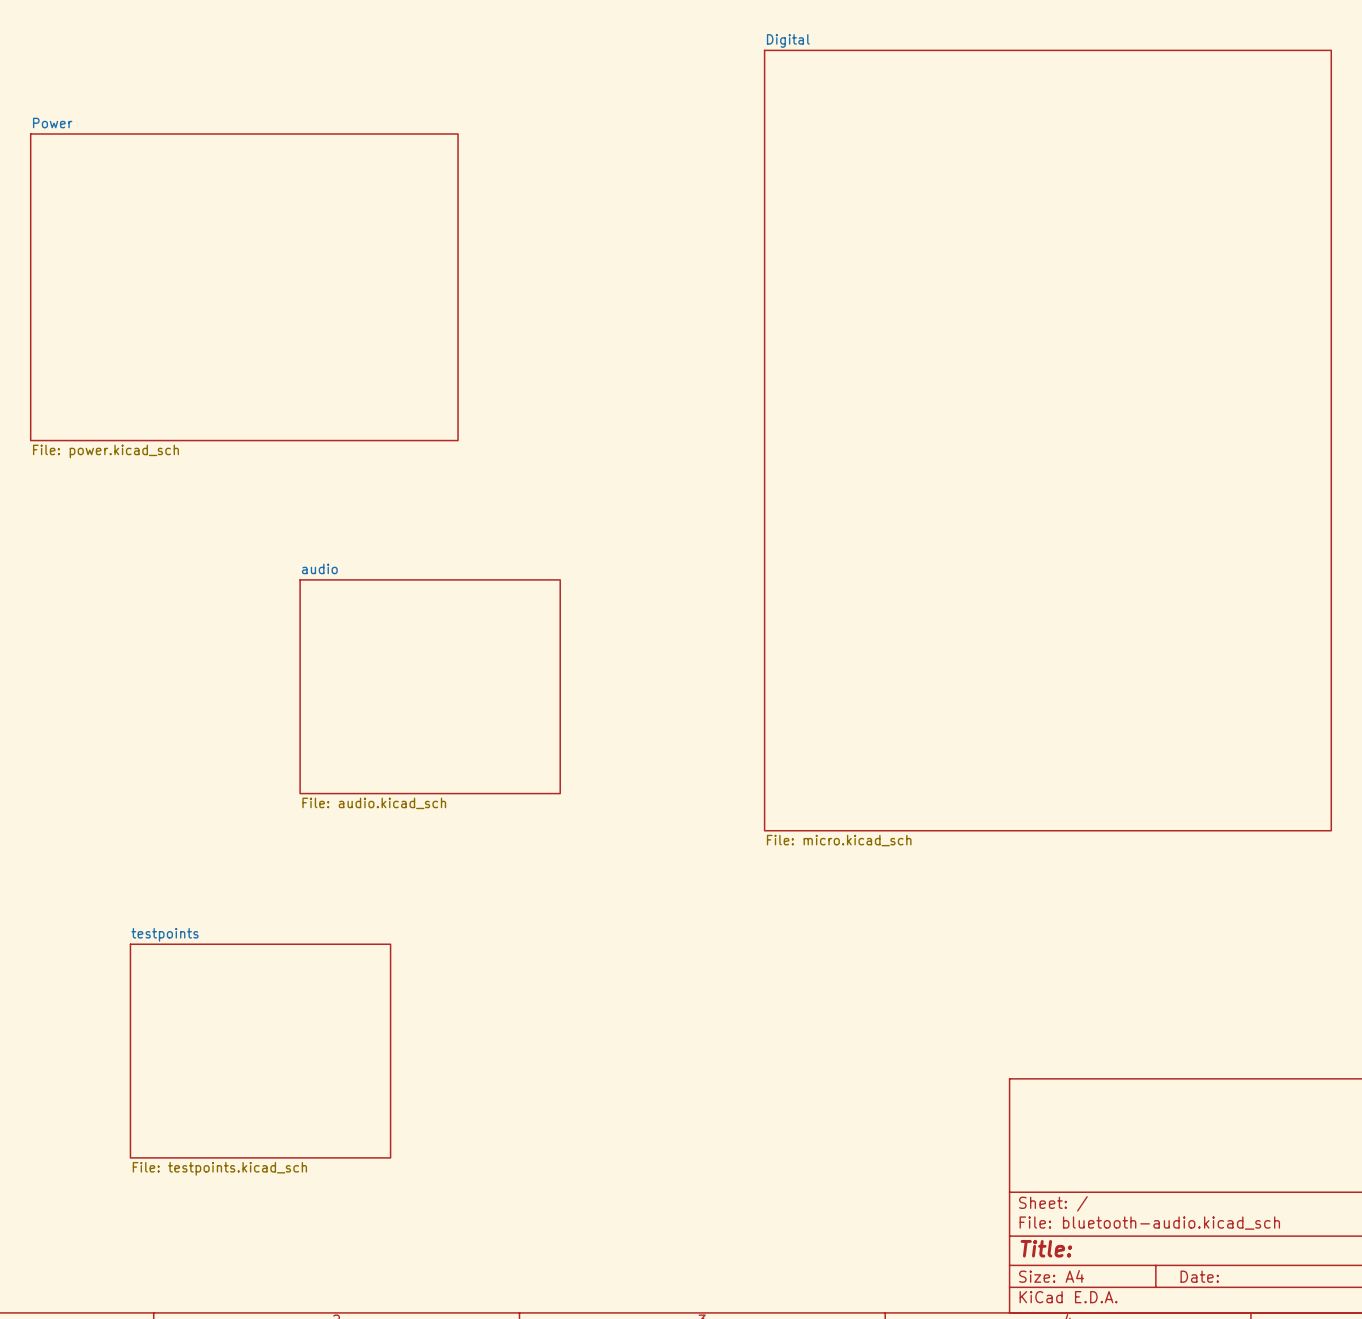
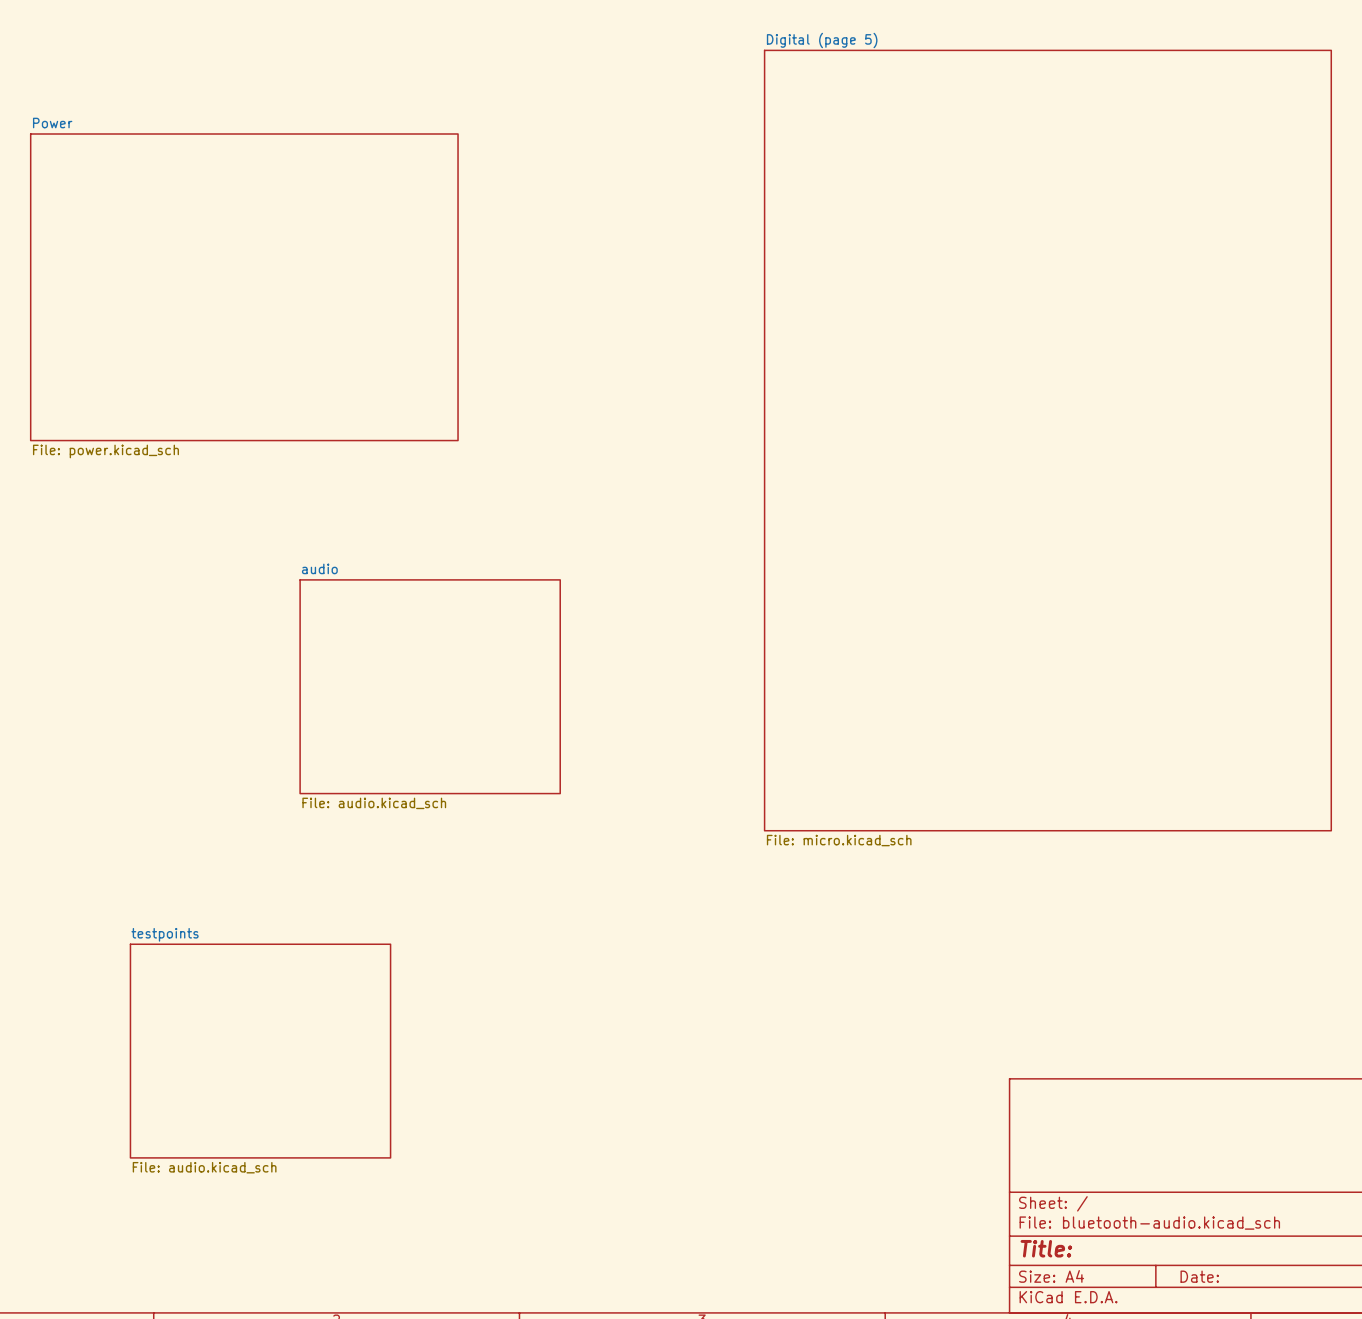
sheet Digital name: Digital (788, 40) -> Digital (page 5) (822, 40)
sheet testpoints value: File: testpoints.kicad_sch (219, 1168) -> File: audio.kicad_sch (204, 1167)

